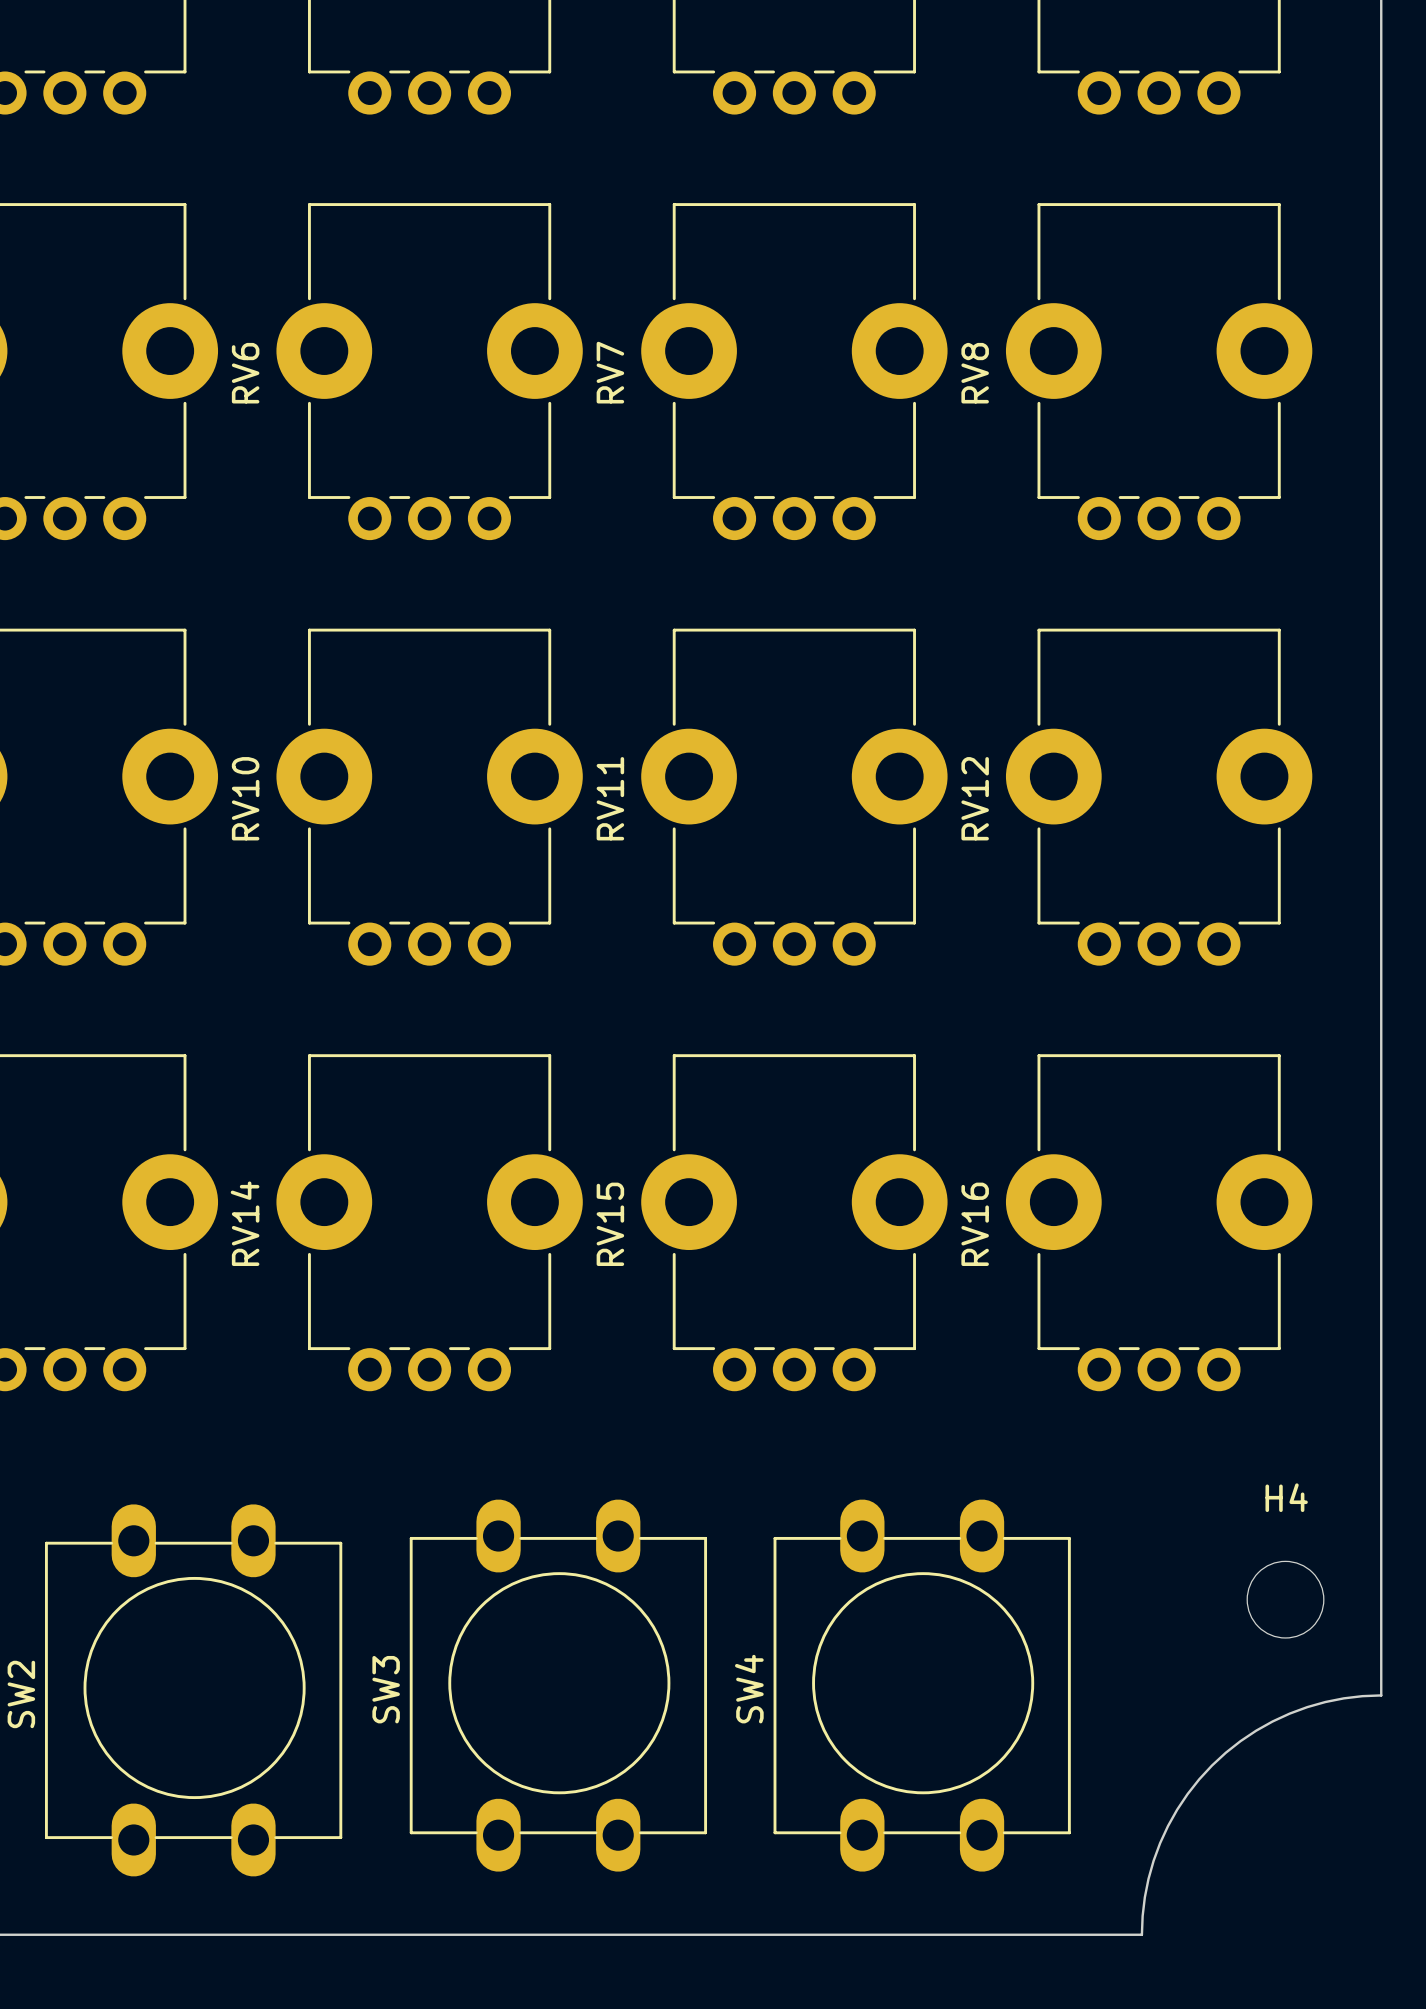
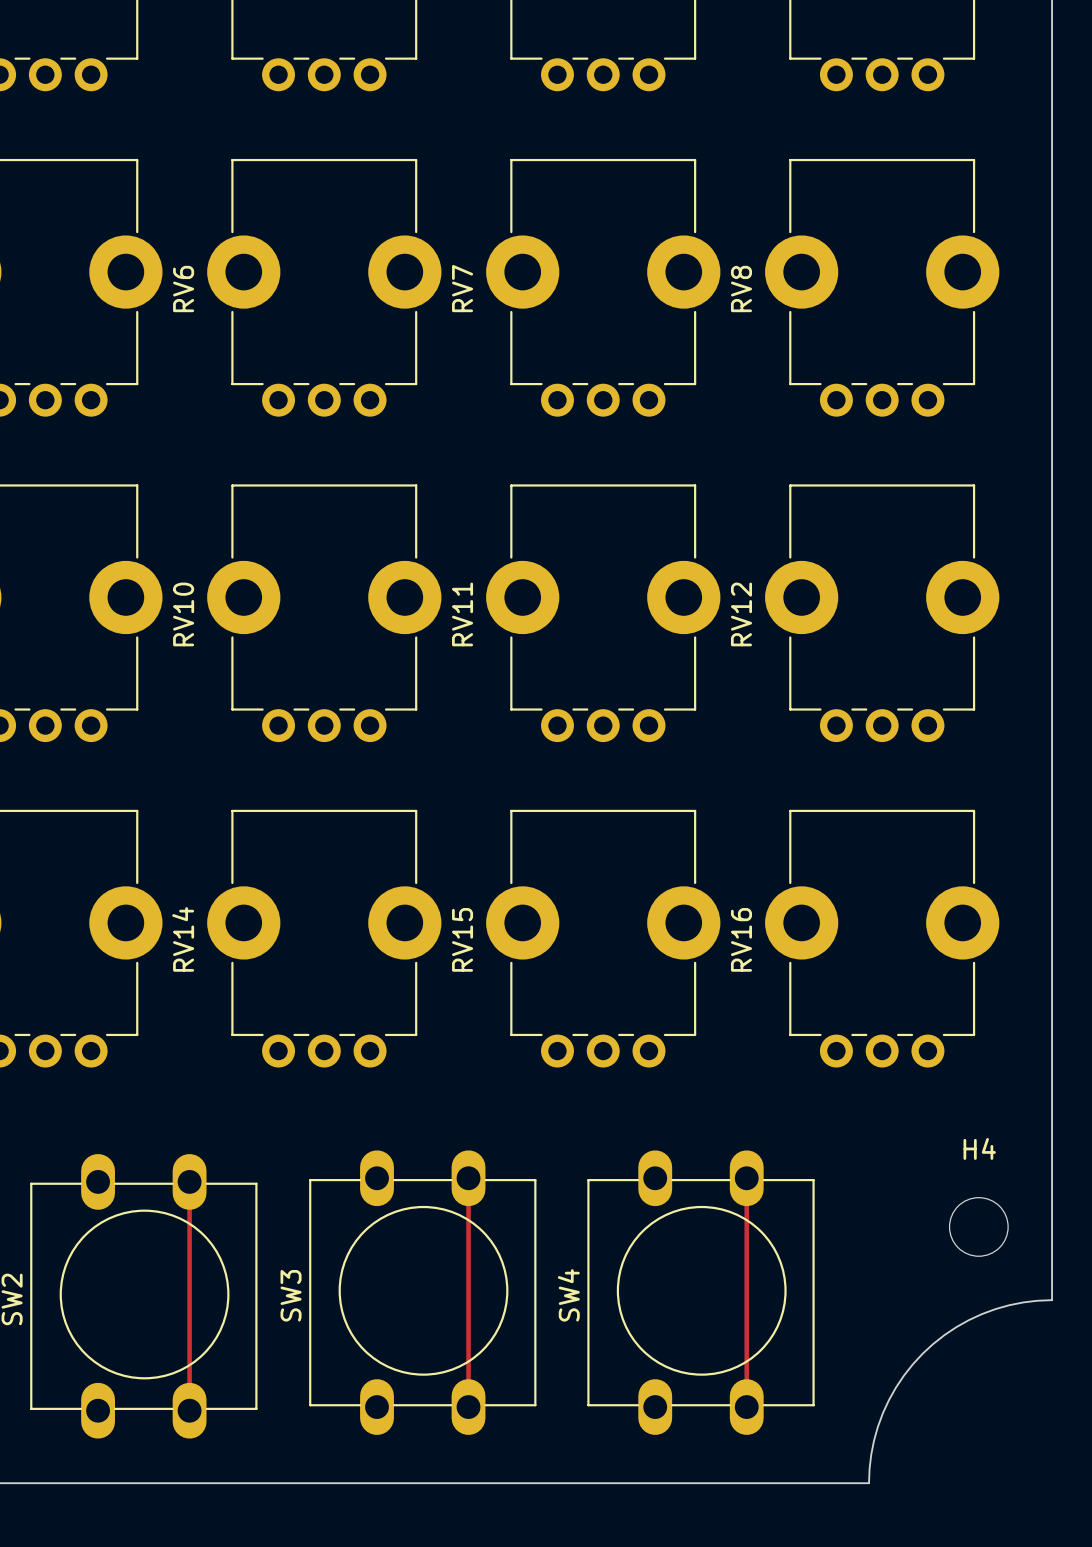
track: none -> (468, 1178) (468, 1407)
track: none -> (746, 1178) (746, 1407)
track: none -> (189, 1181) (189, 1410)

